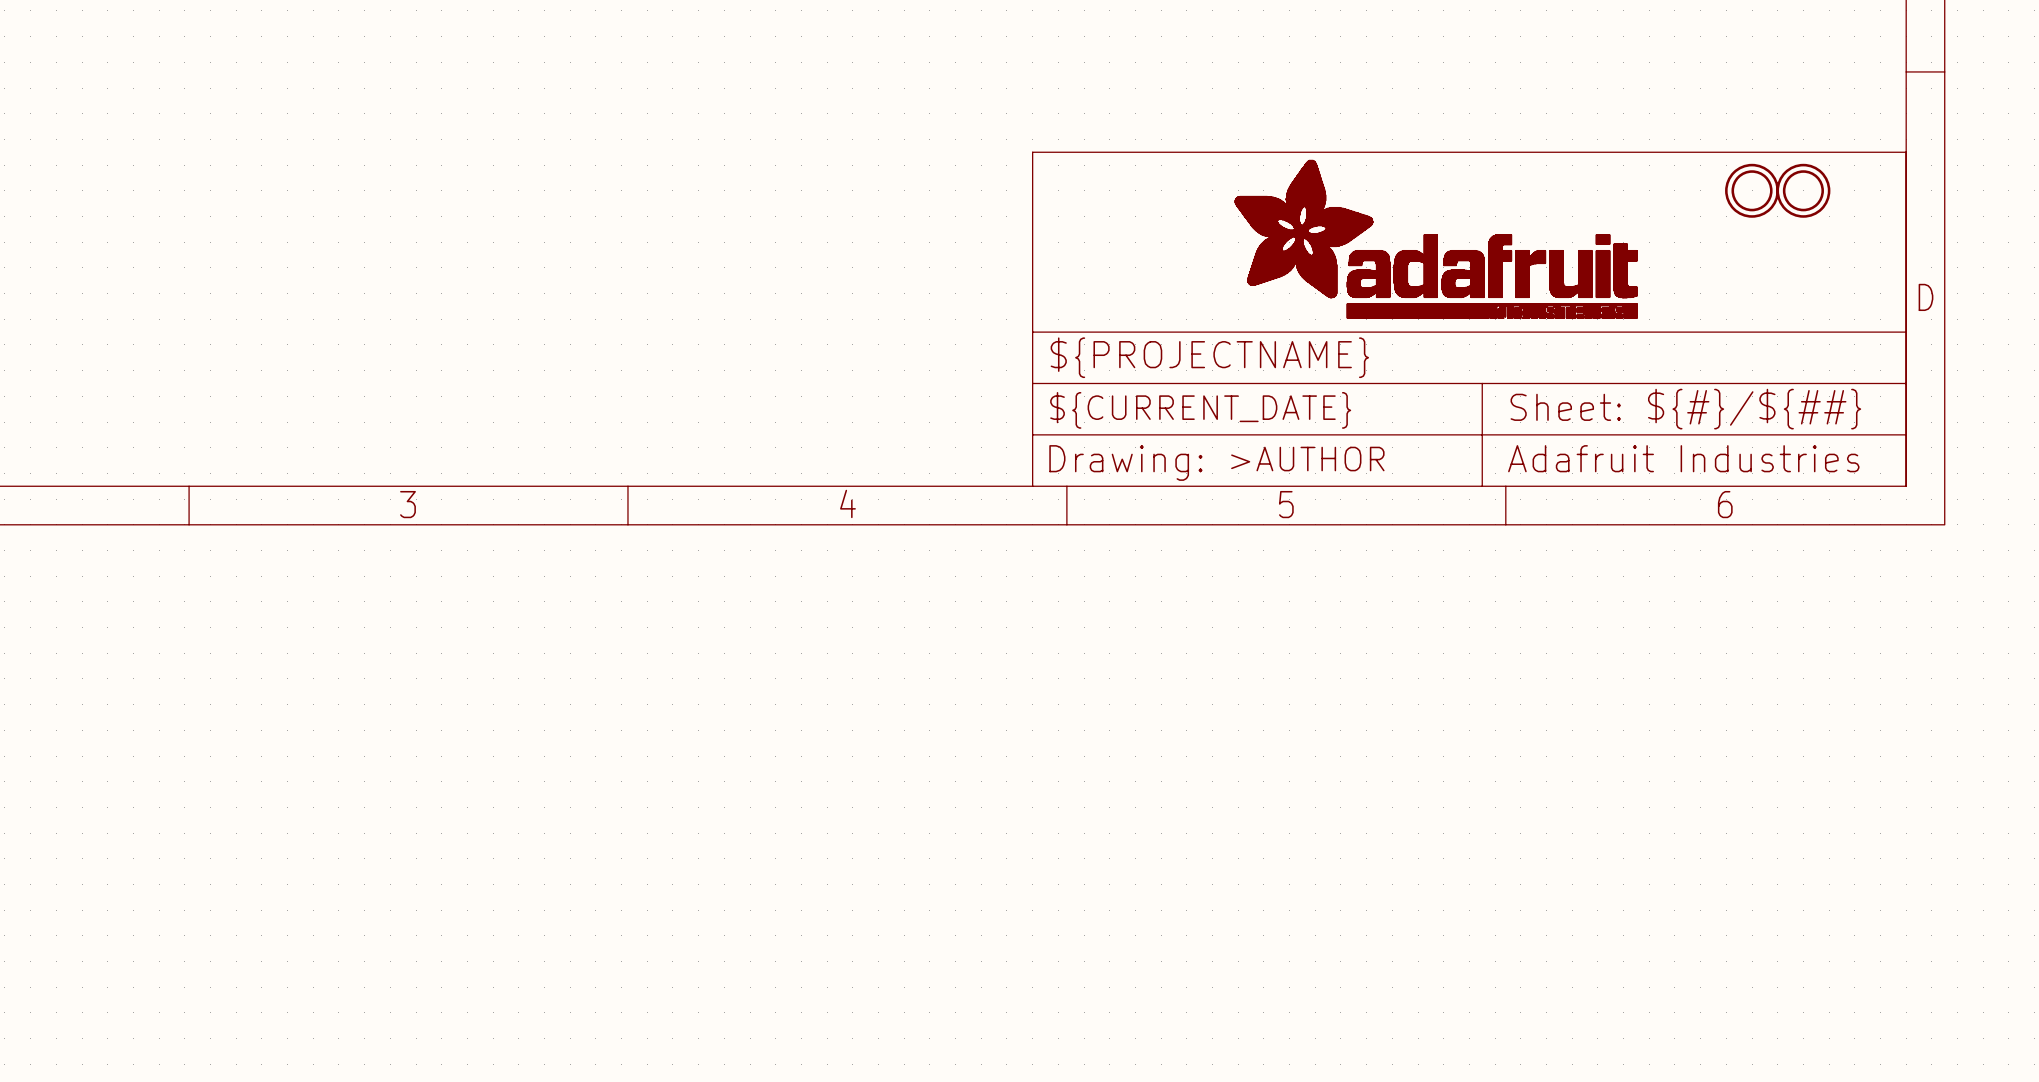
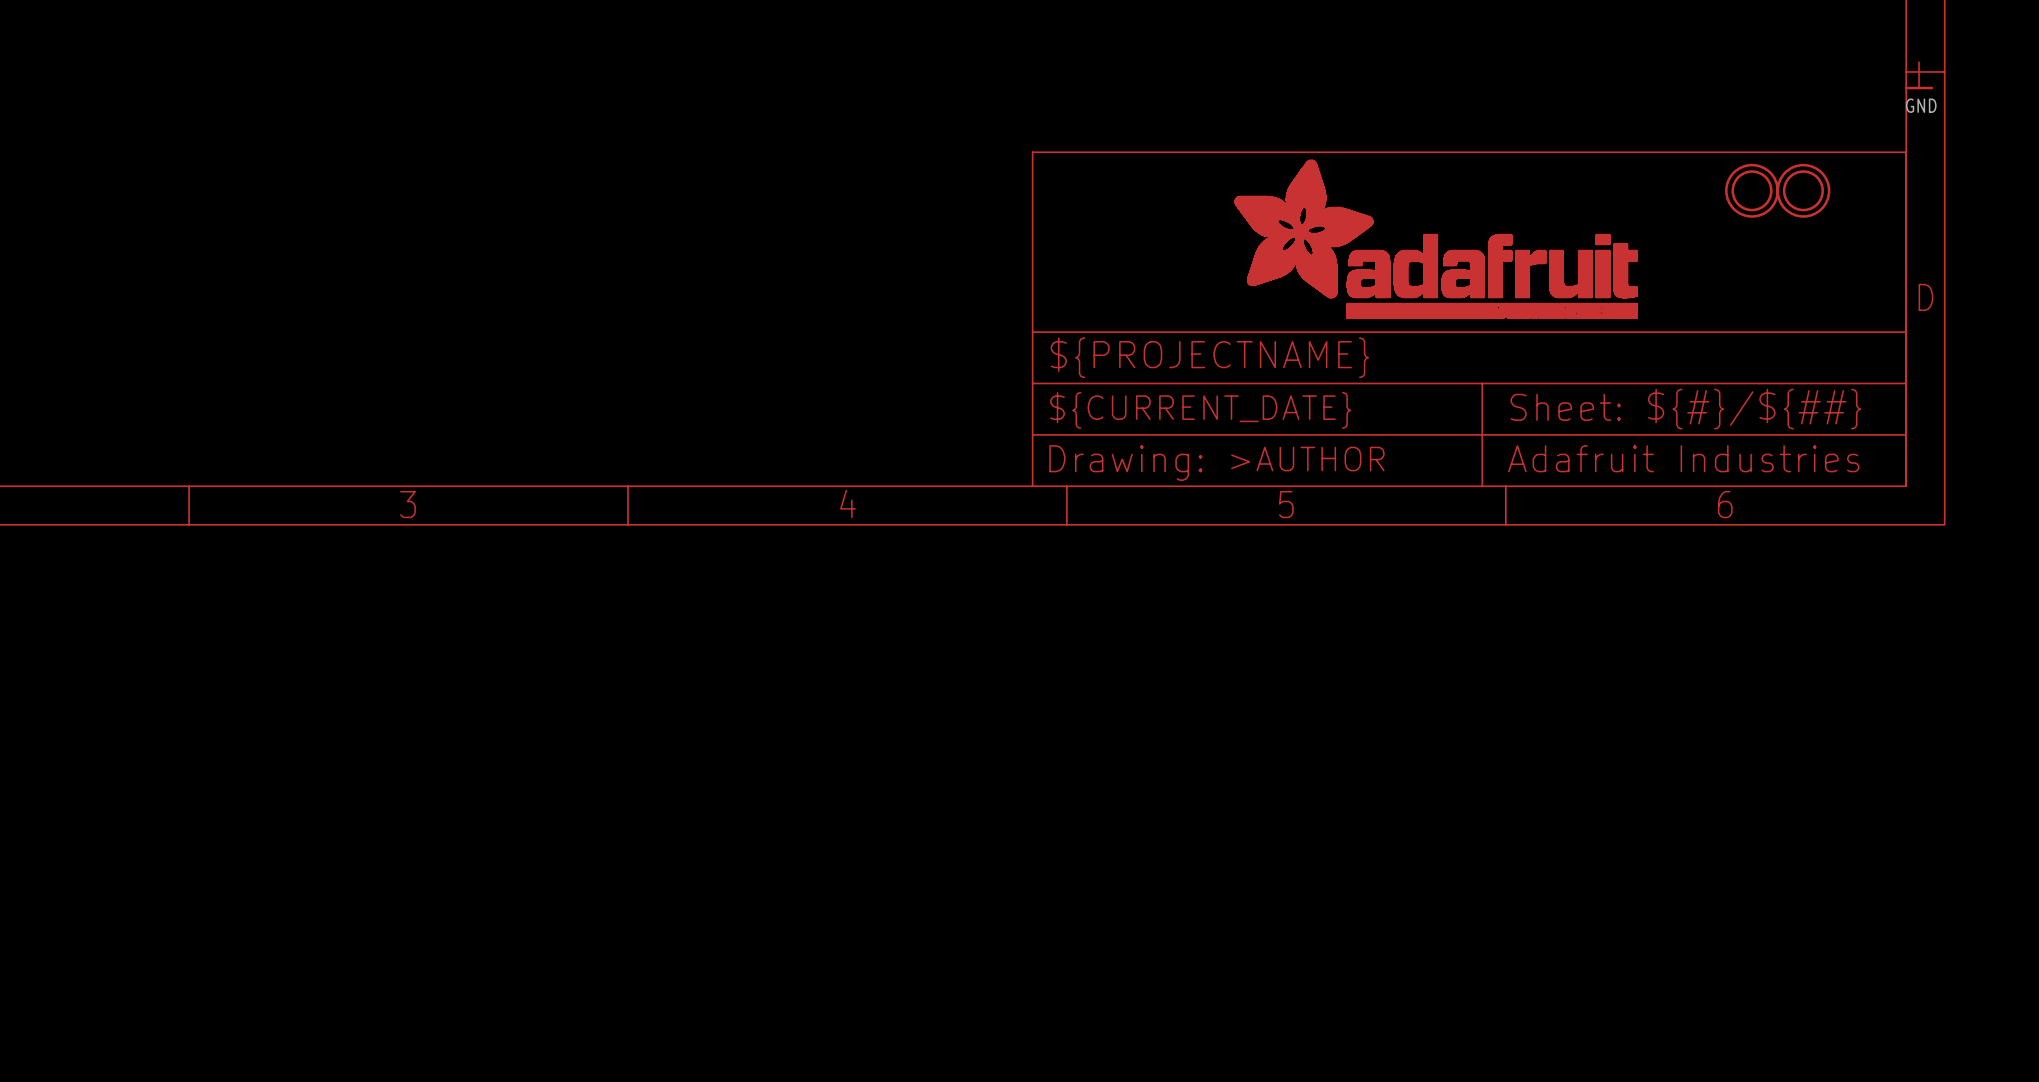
power symbol: none -> GND (1919, 75)

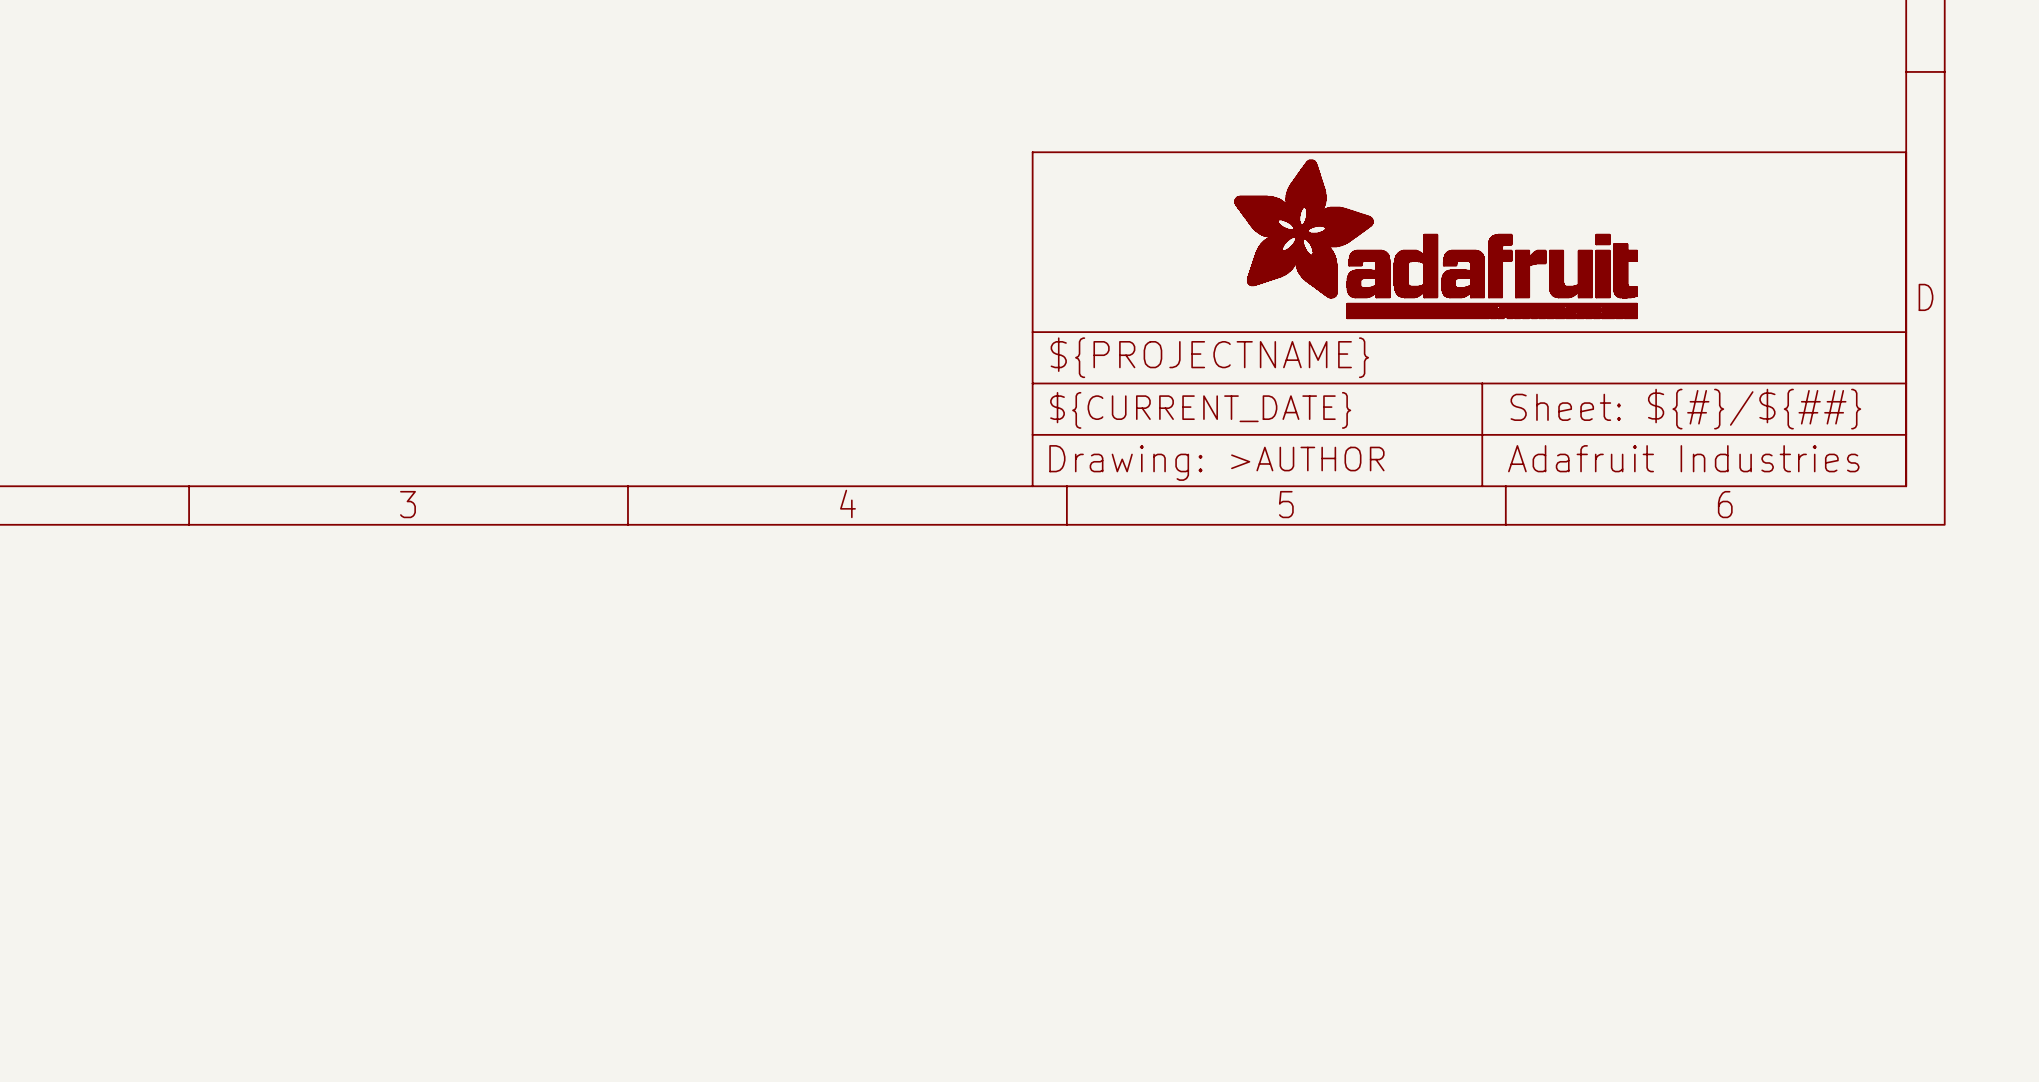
power symbol: GND (1919, 75) -> none
part: (1752, 190) -> none
part: (1803, 190) -> none

